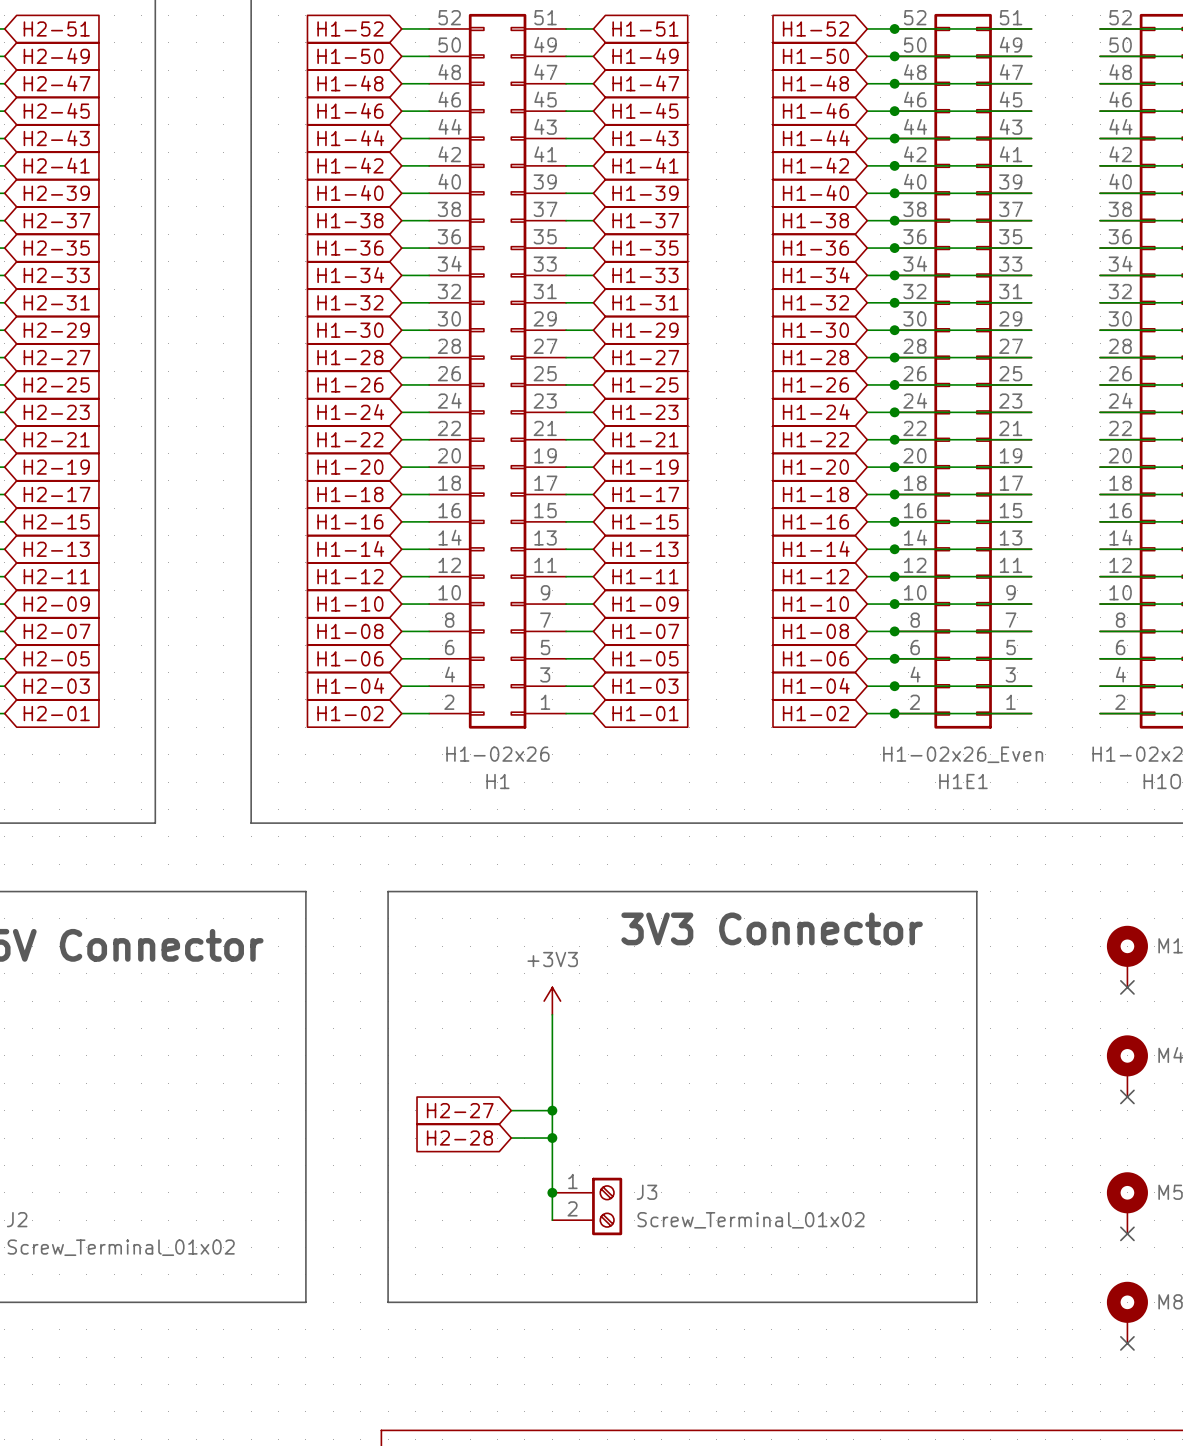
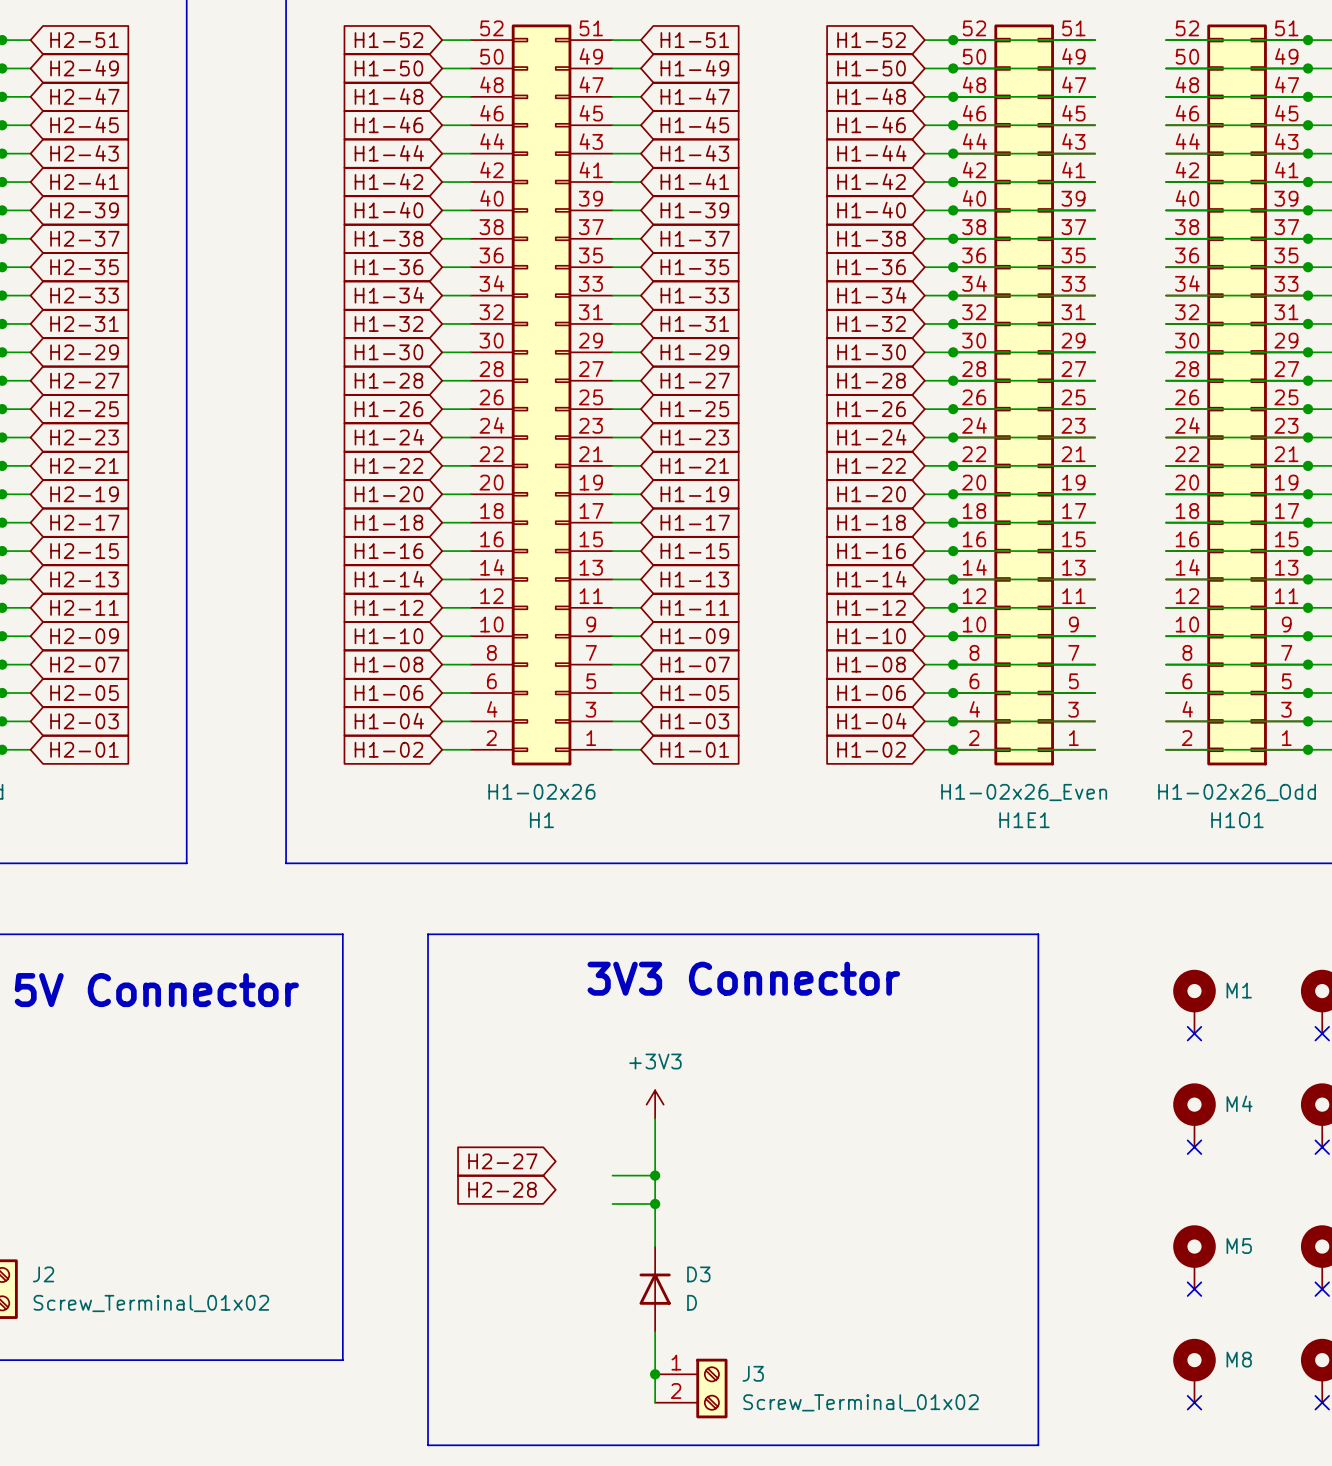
text position: 3V3 Connector (772, 928) -> 3V3 Connector (743, 978)
power symbol position: +3V3 (552, 1001) -> +3V3 (655, 1104)
wire: (552, 1014) (552, 1220) -> none
wire: none -> (655, 1118) (655, 1246)
wire: (511, 1110) (552, 1110) -> (612, 1175) (655, 1175)
junction: (552, 1110) -> none
junction: none -> (655, 1175)
wire: (511, 1138) (552, 1138) -> (612, 1203) (655, 1203)
junction: (552, 1138) -> none
junction: none -> (655, 1203)
junction: (552, 1192) -> none
J3 position: (587, 1206) -> (691, 1388)
D3: none -> D (655, 1289)
wire: none -> (655, 1331) (655, 1402)
line: (388, 1302) (976, 1302) -> (428, 1360) (428, 1445) (1038, 1445) (1038, 1360)
junction: none -> (655, 1374)

